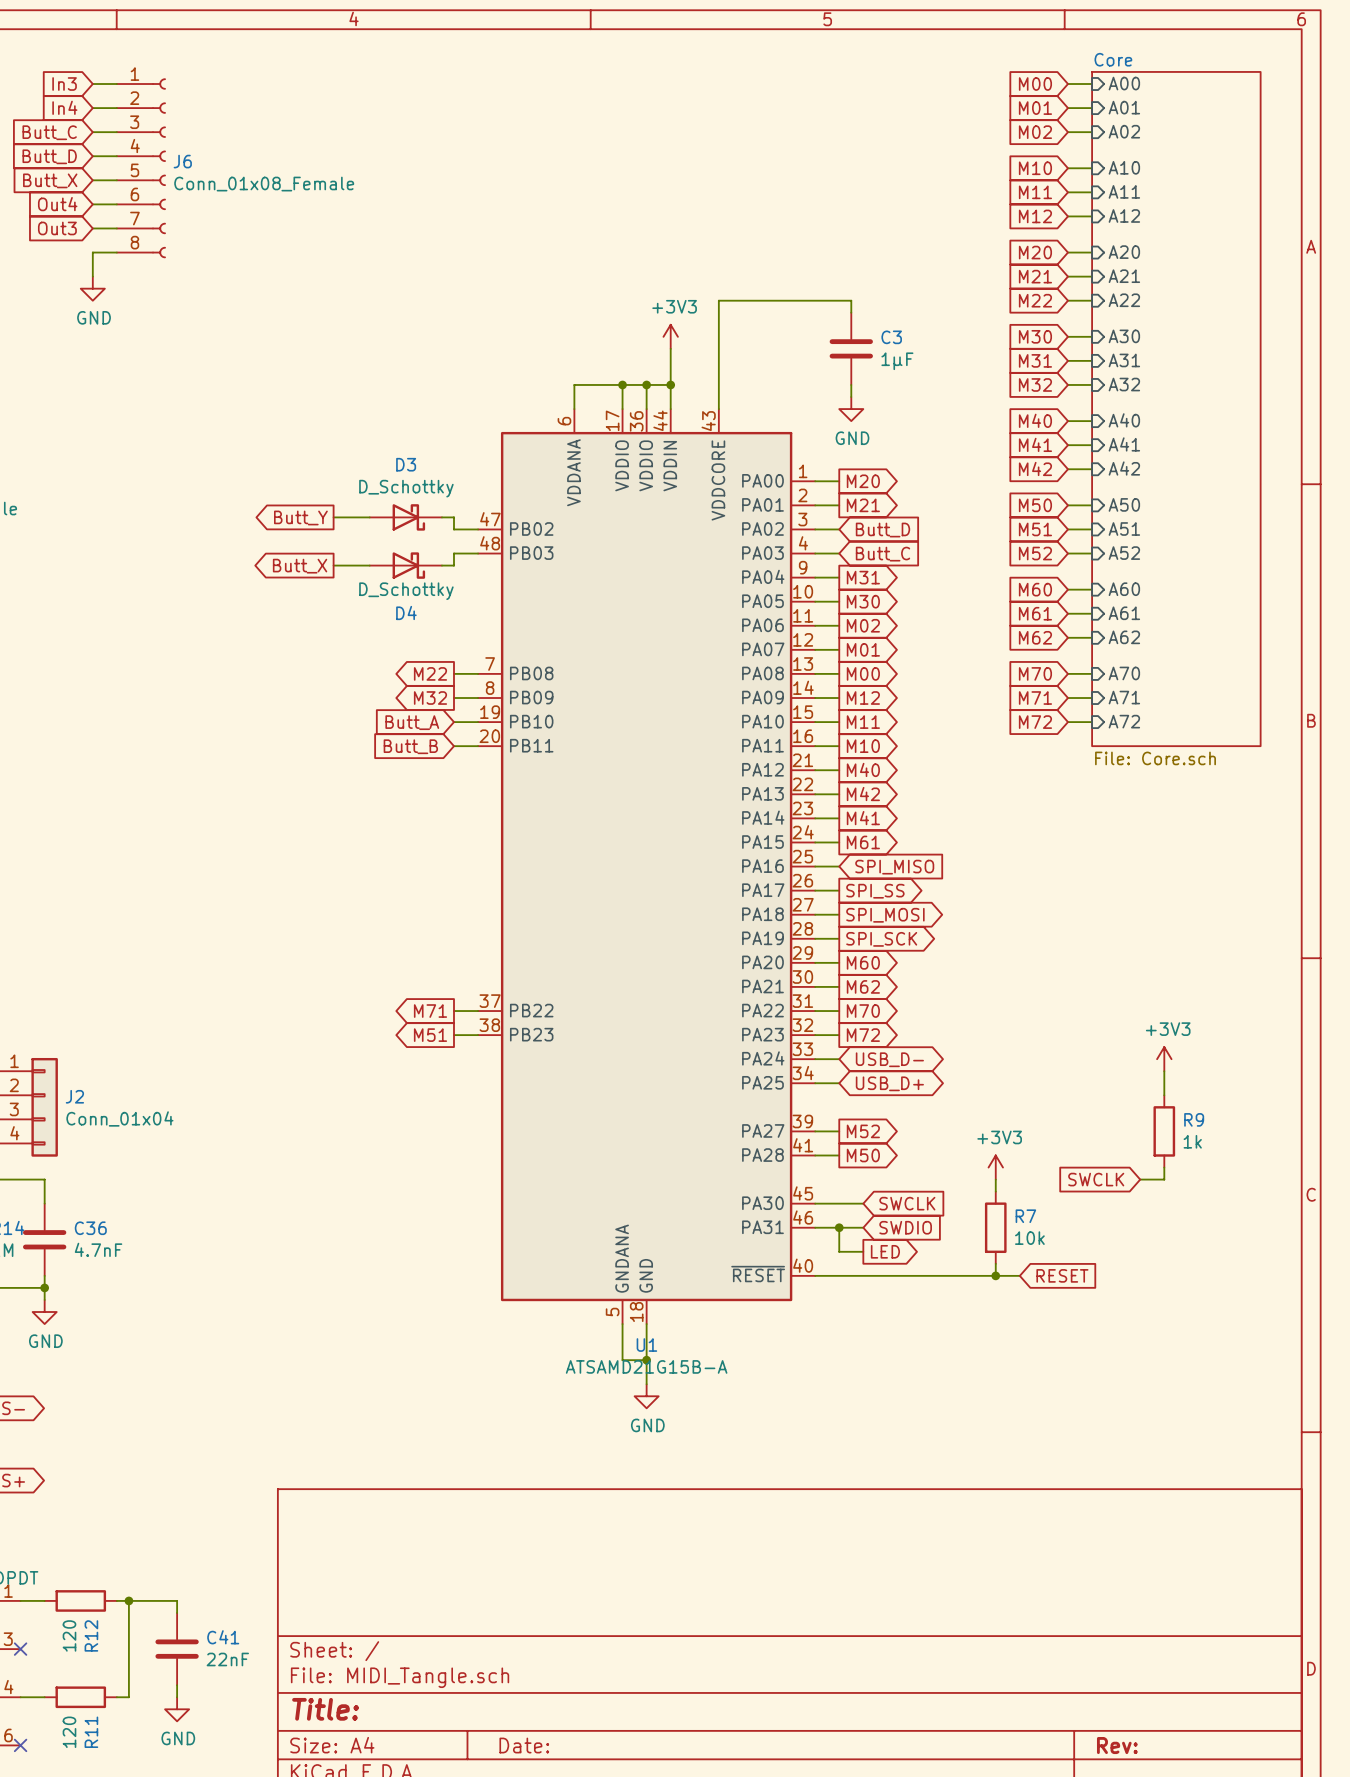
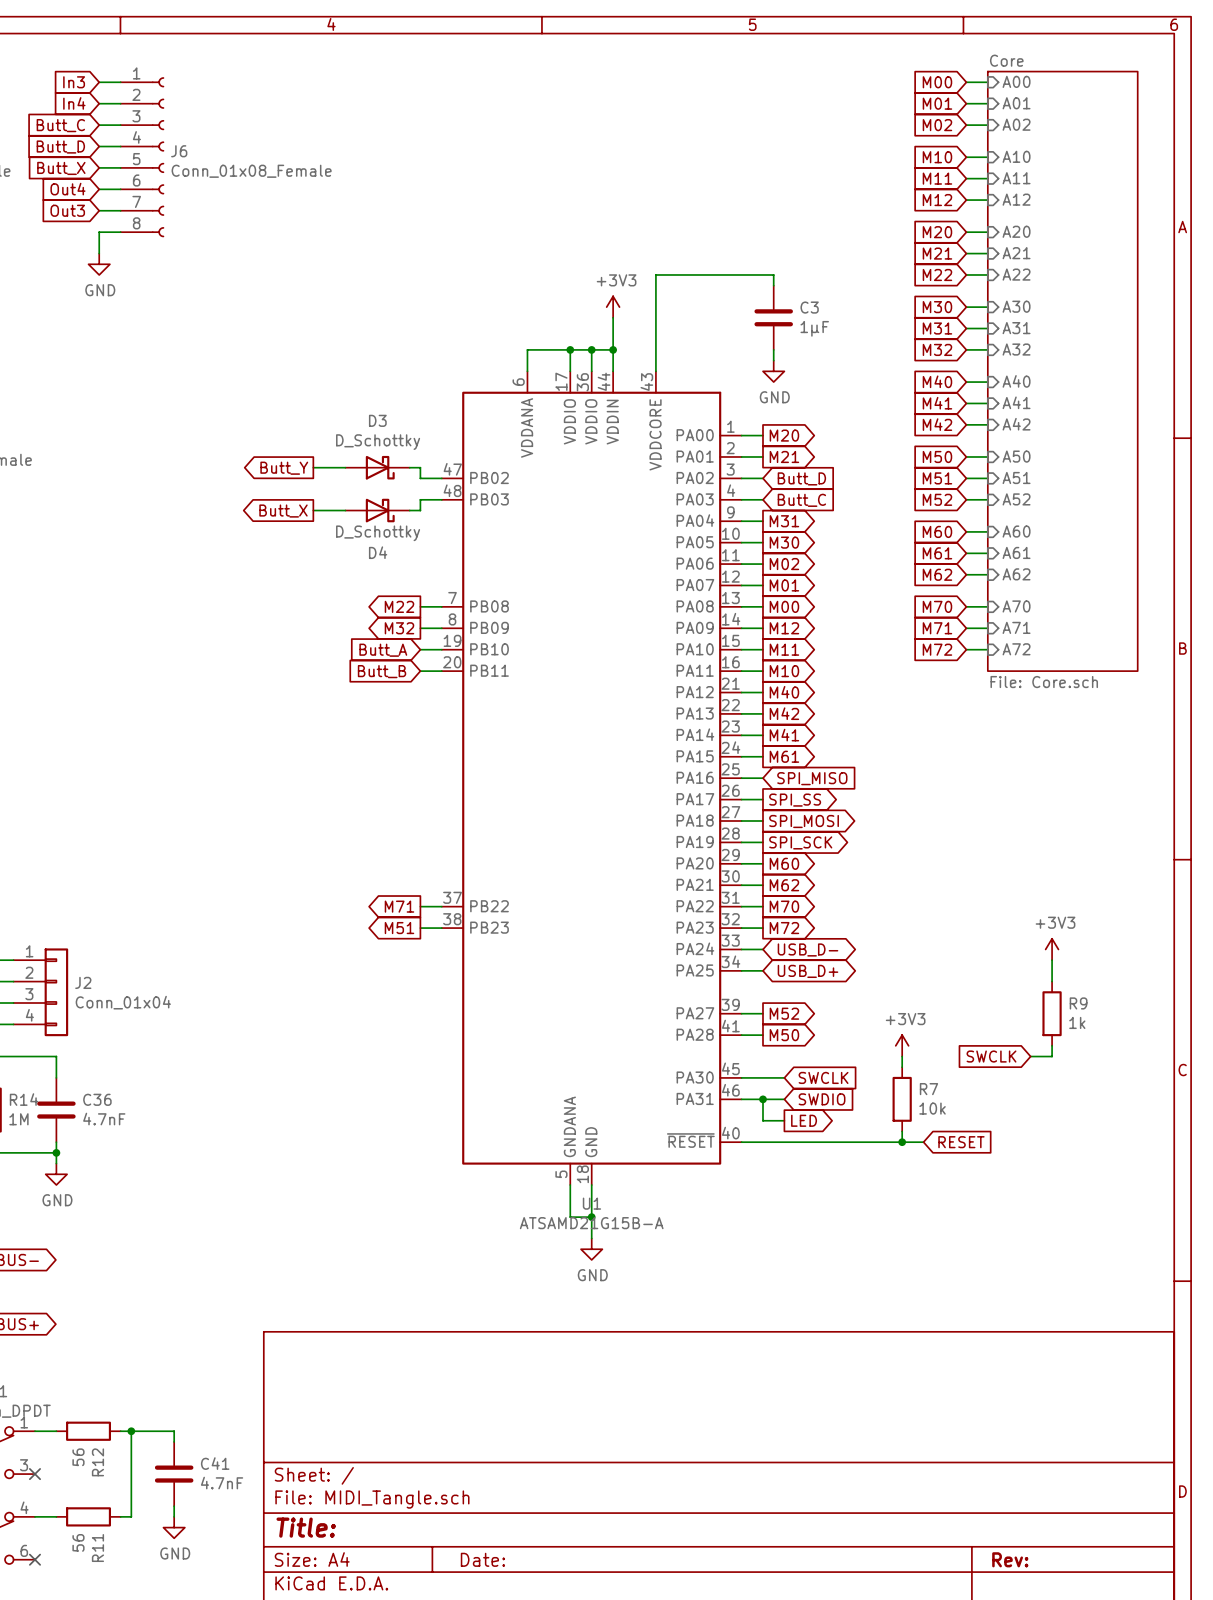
R12 value: 120 (69, 1635) -> 56 (78, 1457)
C41 value: 22nF (227, 1659) -> 4.7nF (222, 1483)
R11 value: 120 (69, 1732) -> 56 (78, 1542)

